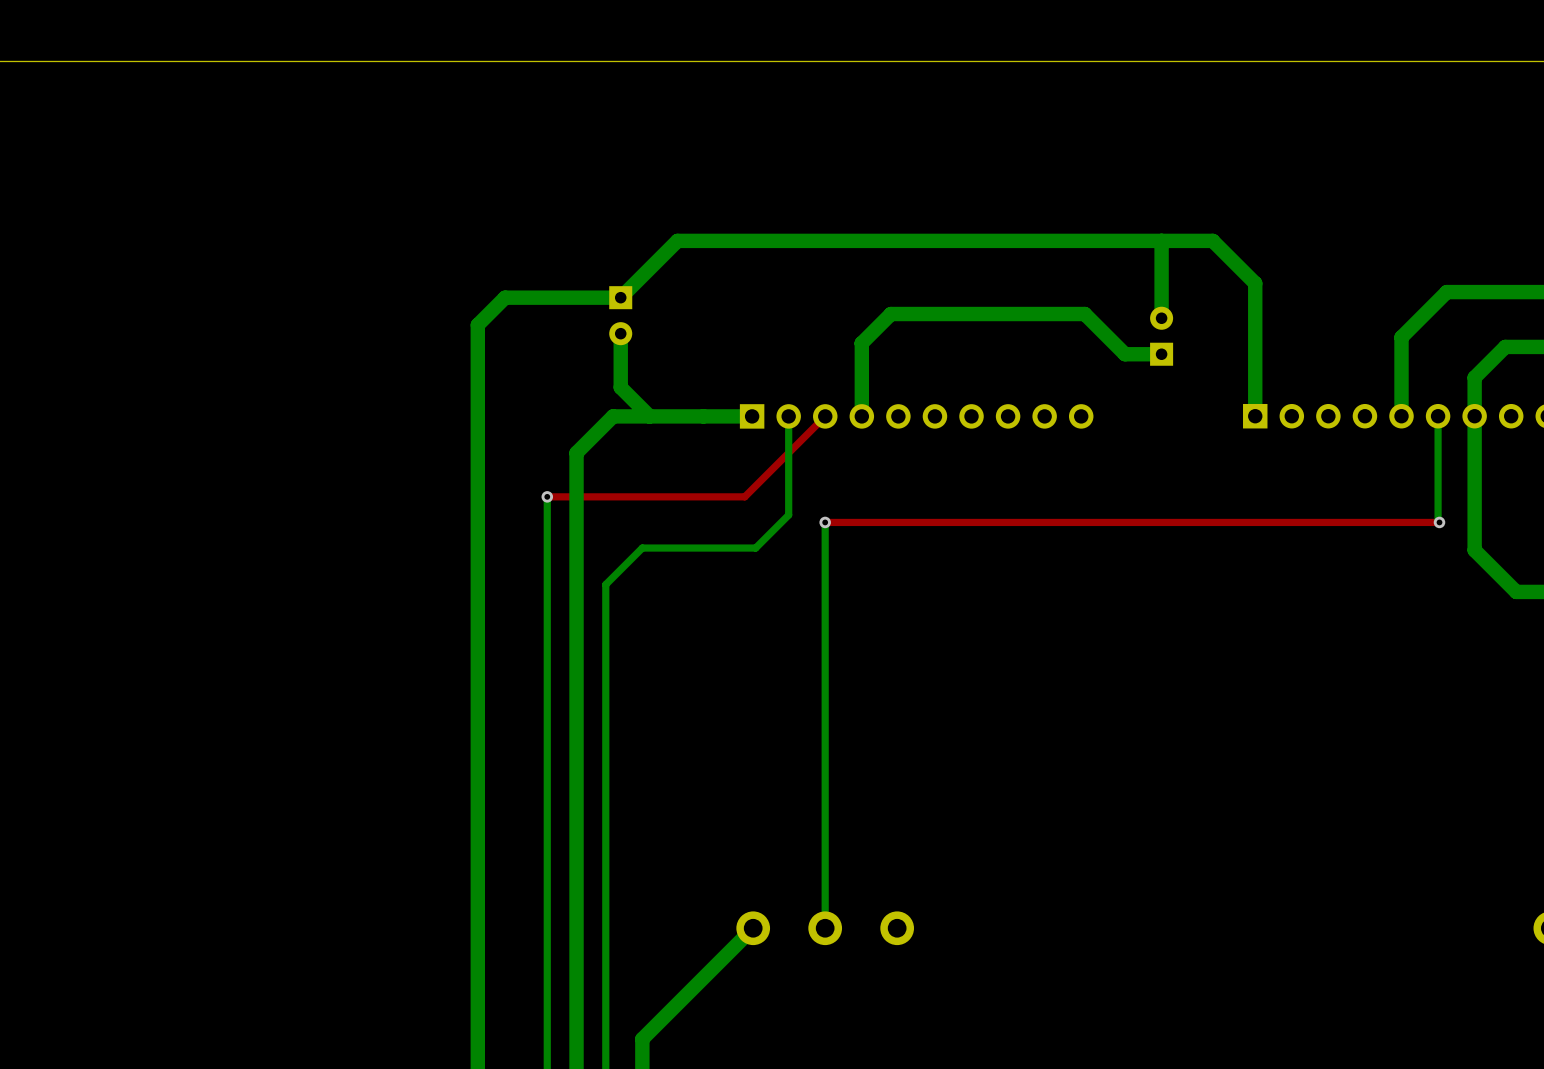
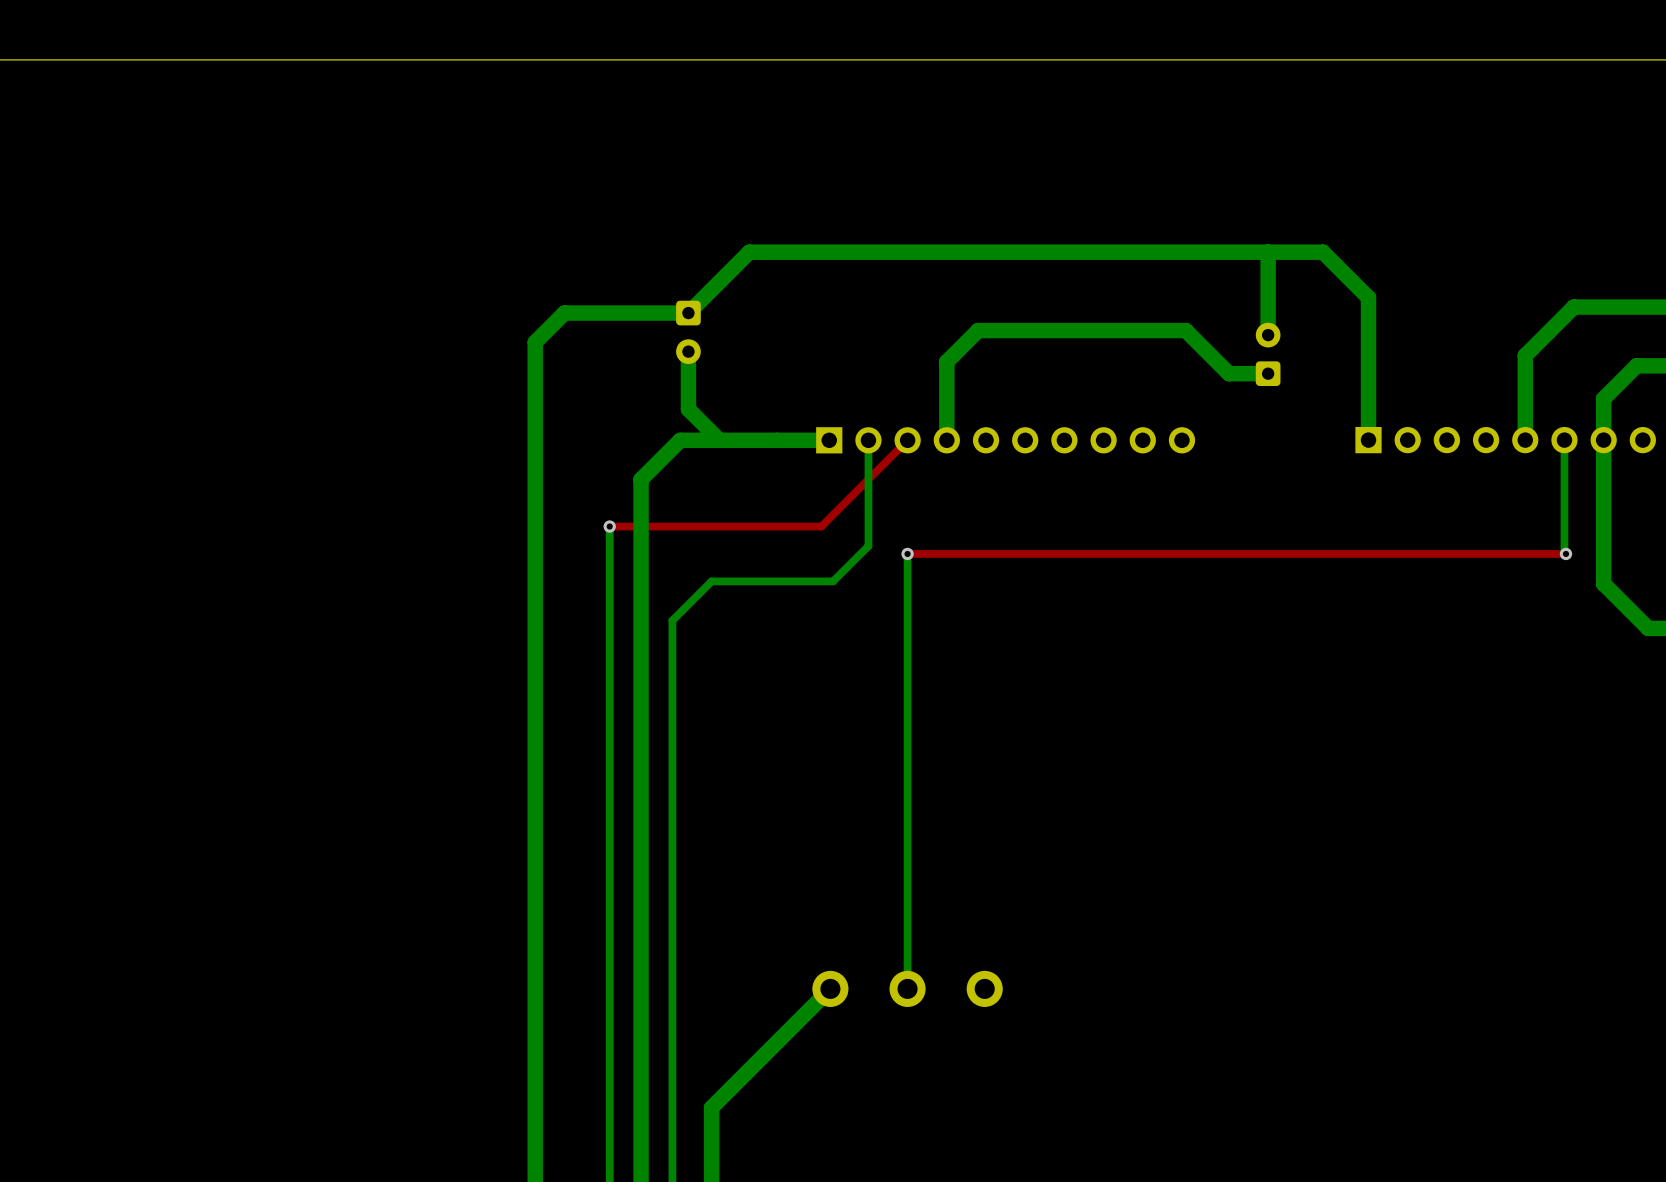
part footprint: [609, 286, 633, 346] -> [676, 300, 701, 364]
part footprint: [1150, 306, 1174, 366] -> [1255, 322, 1281, 387]

